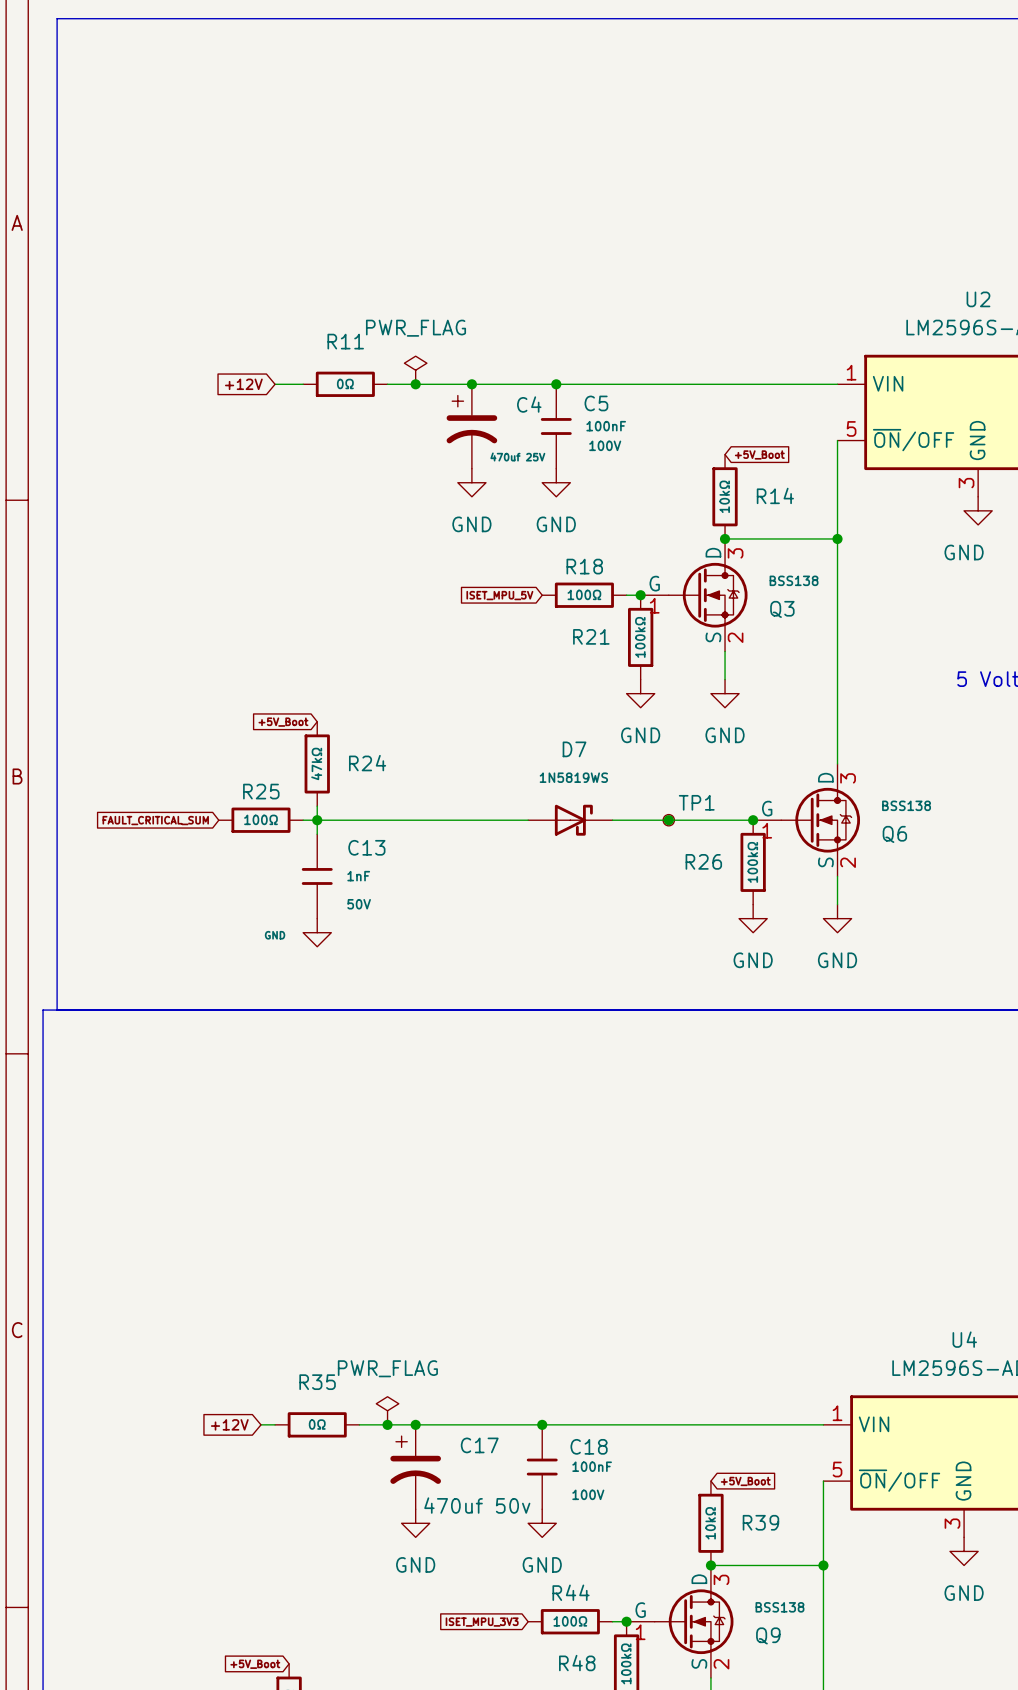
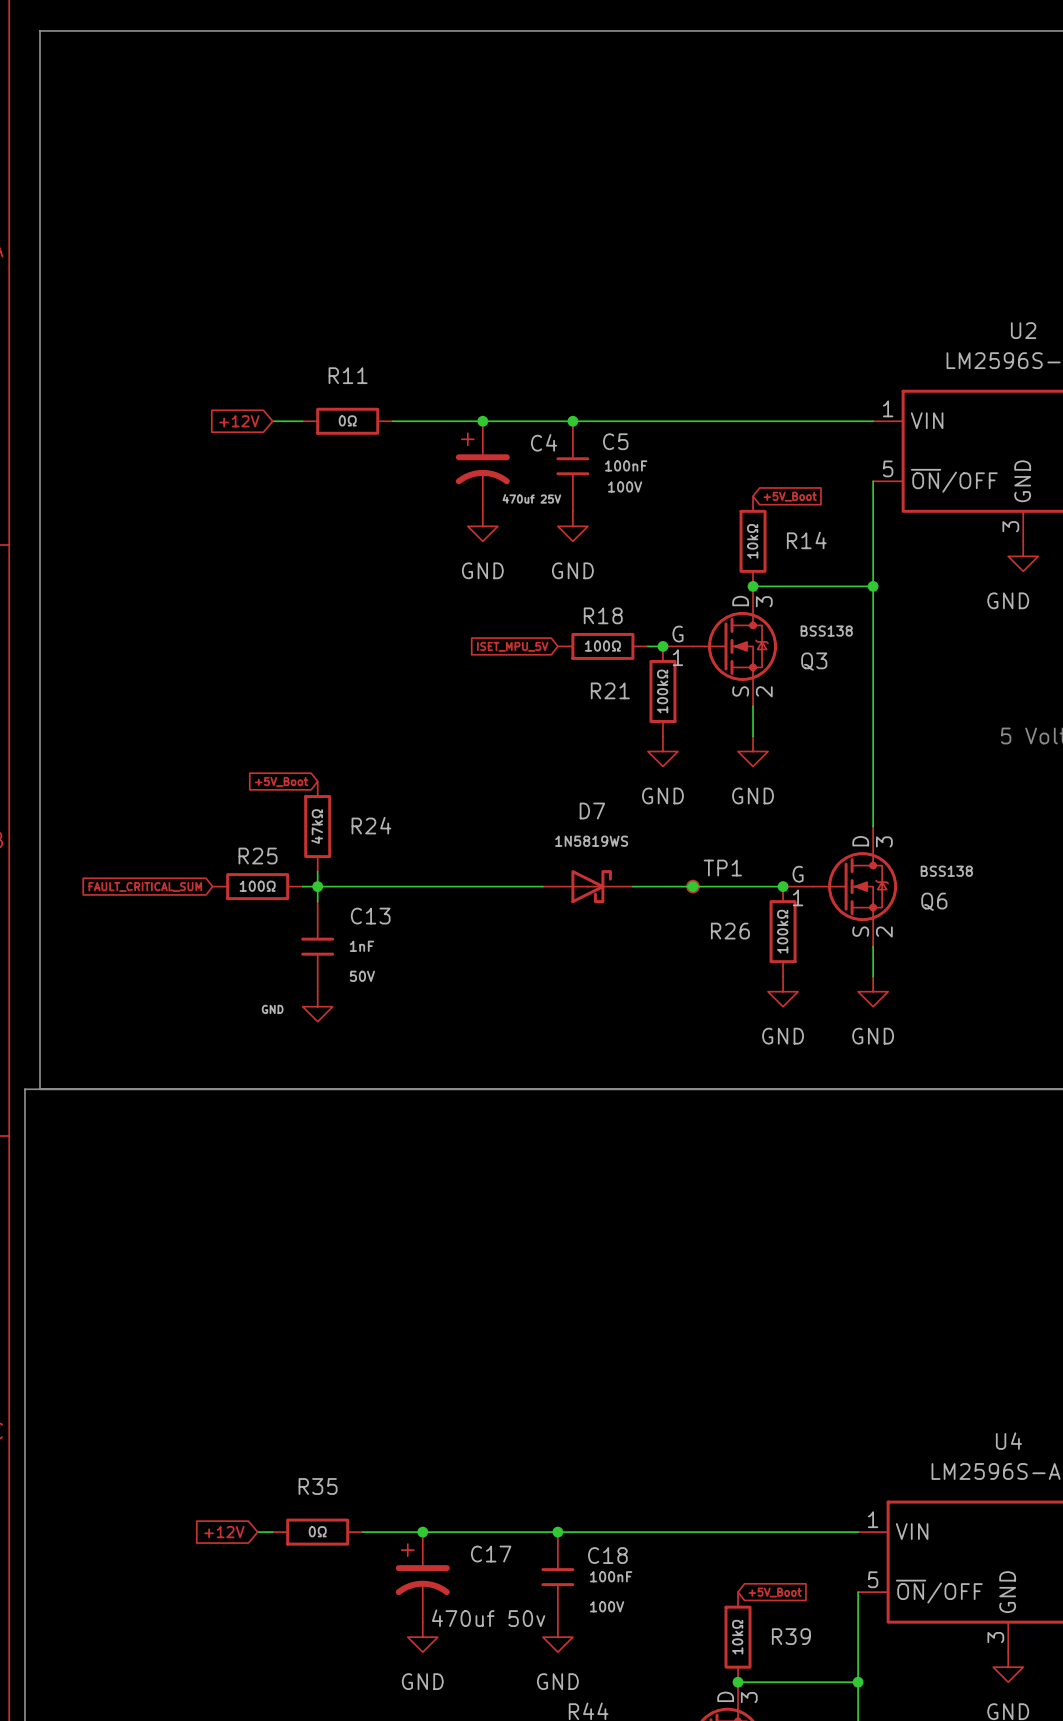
power symbol: PWR_FLAG (415, 370) -> none
junction: (415, 384) -> none
power symbol: PWR_FLAG (387, 1410) -> none
junction: (387, 1424) -> none

